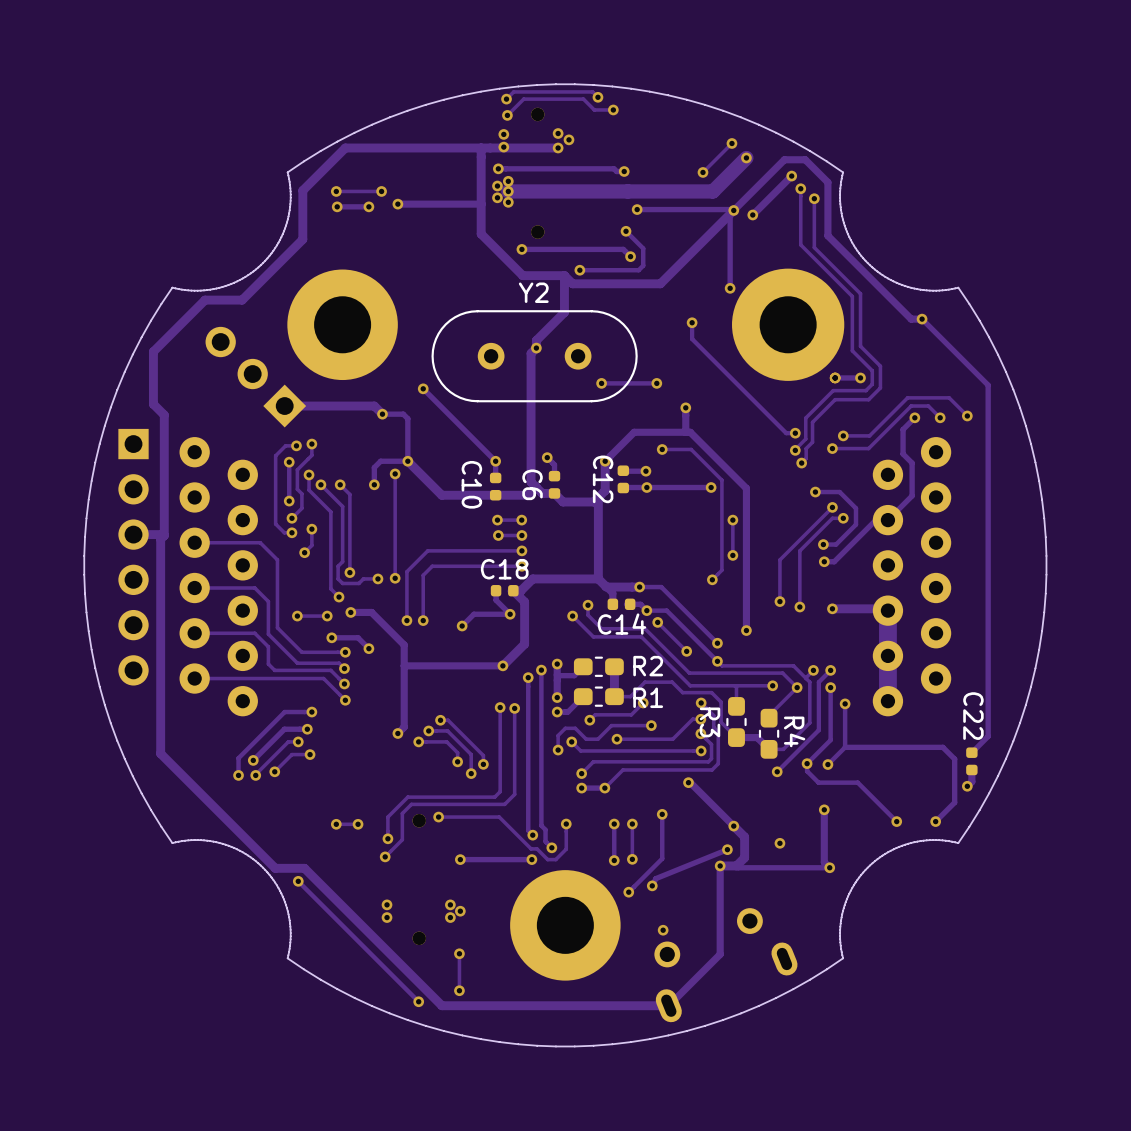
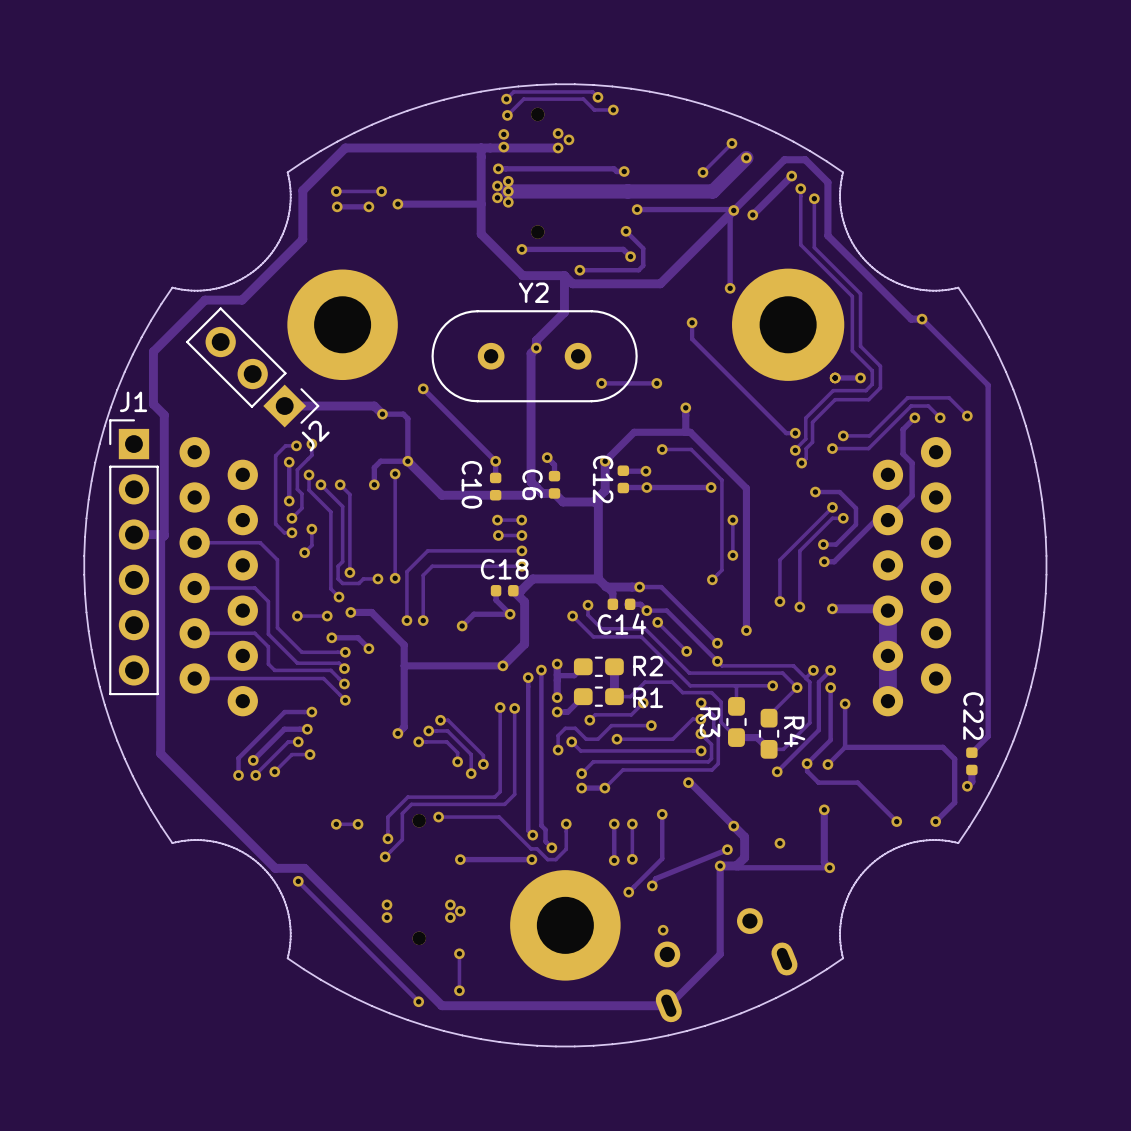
J2 side: top (255, 377) -> bottom (252, 367)
J1 side: top (133, 557) -> bottom (133, 557)

